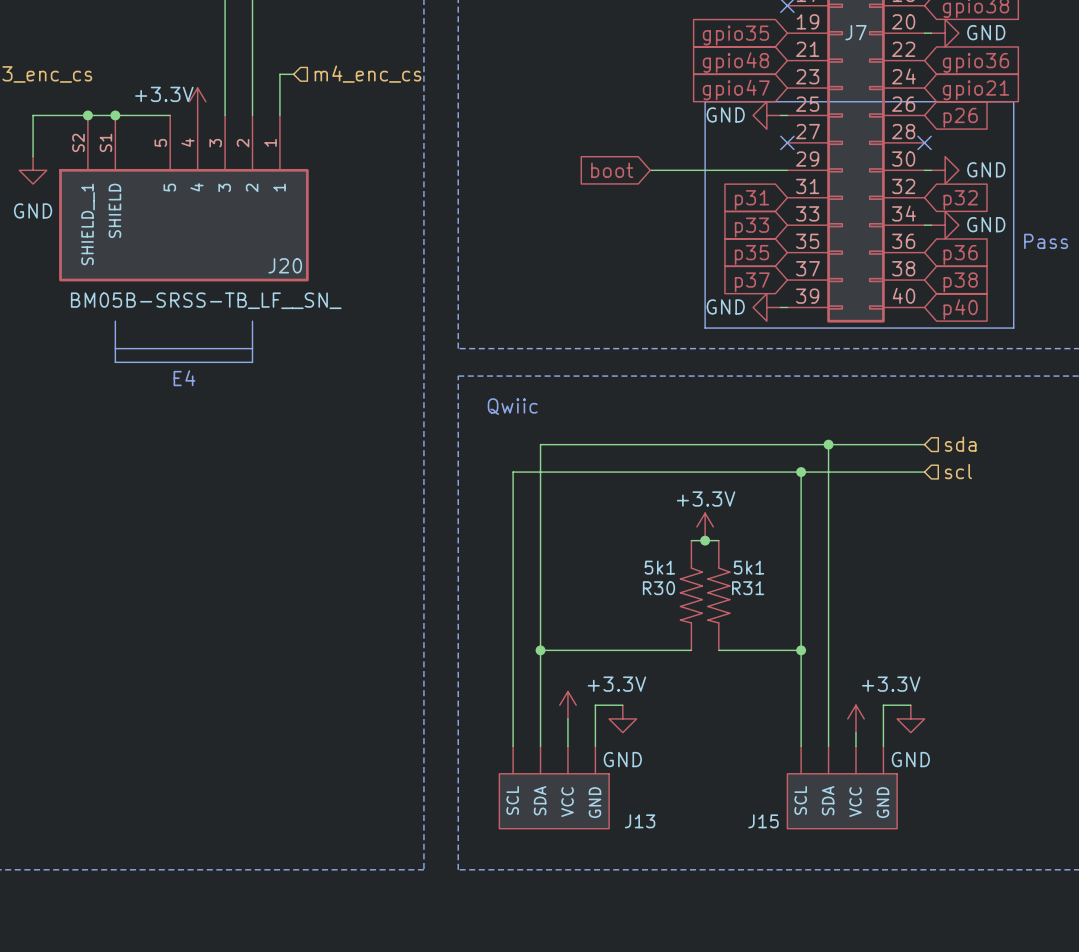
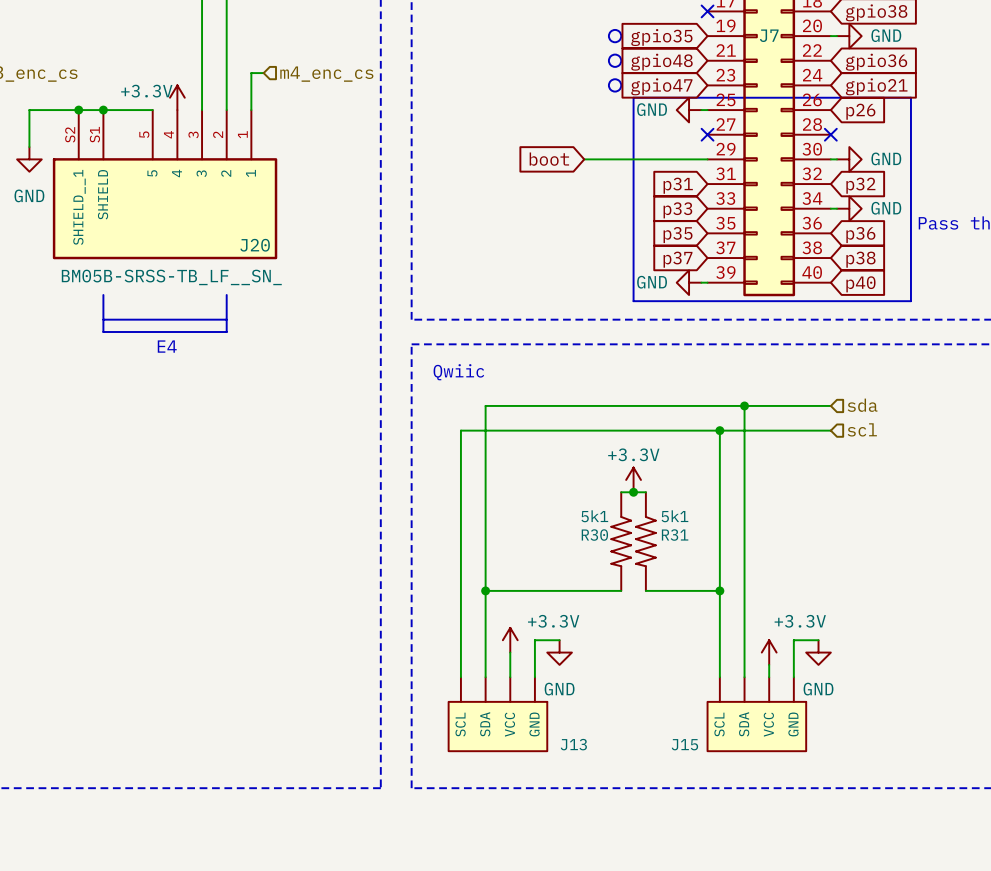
drawing: none -> [608, 29, 622, 43]
drawing: none -> [608, 54, 622, 67]
drawing: none -> [608, 79, 622, 92]

